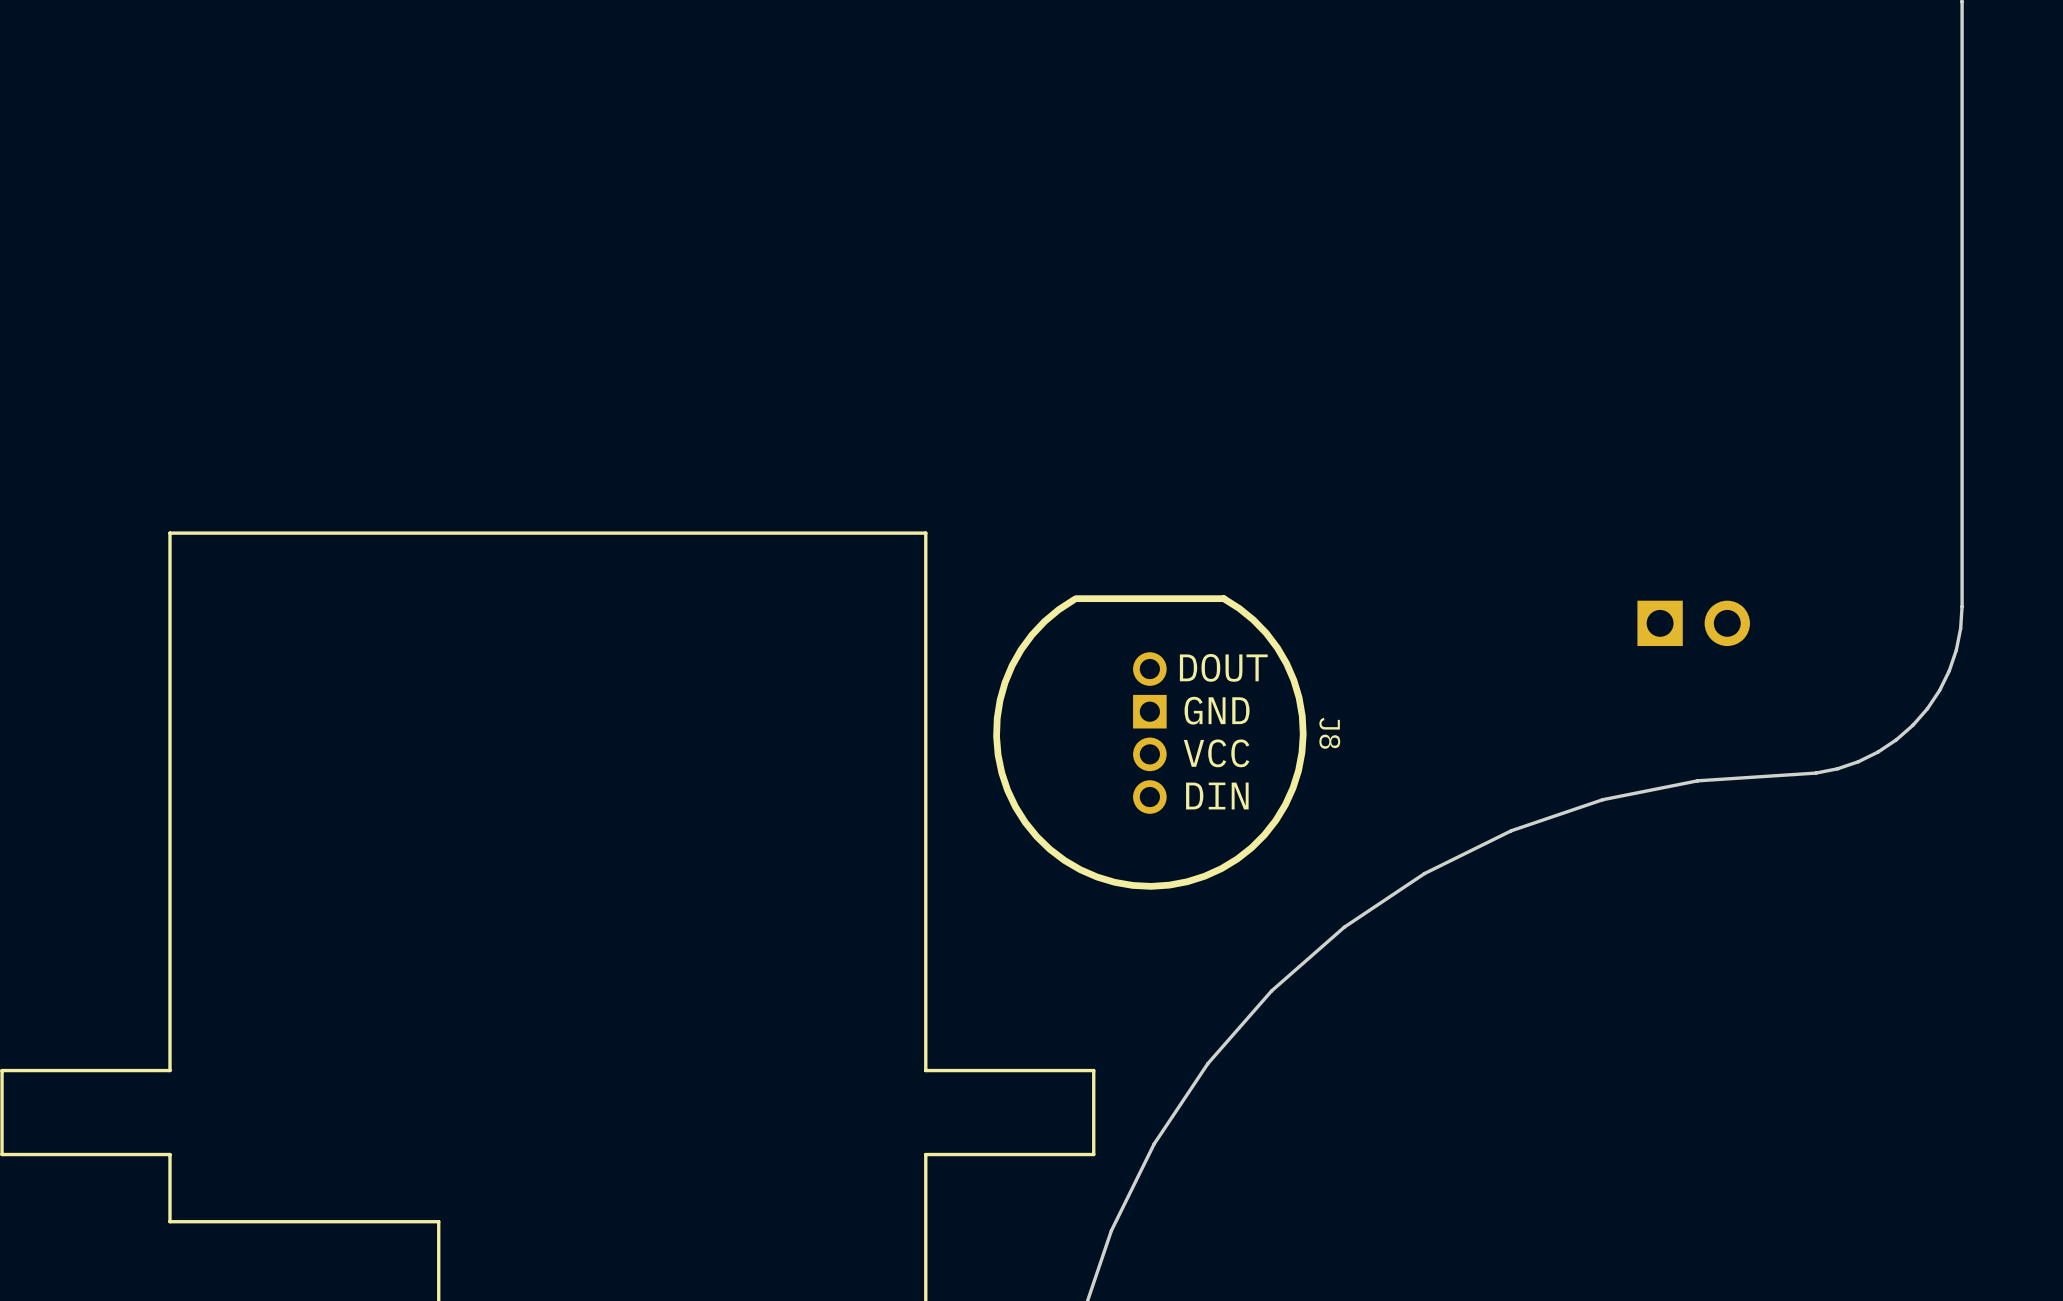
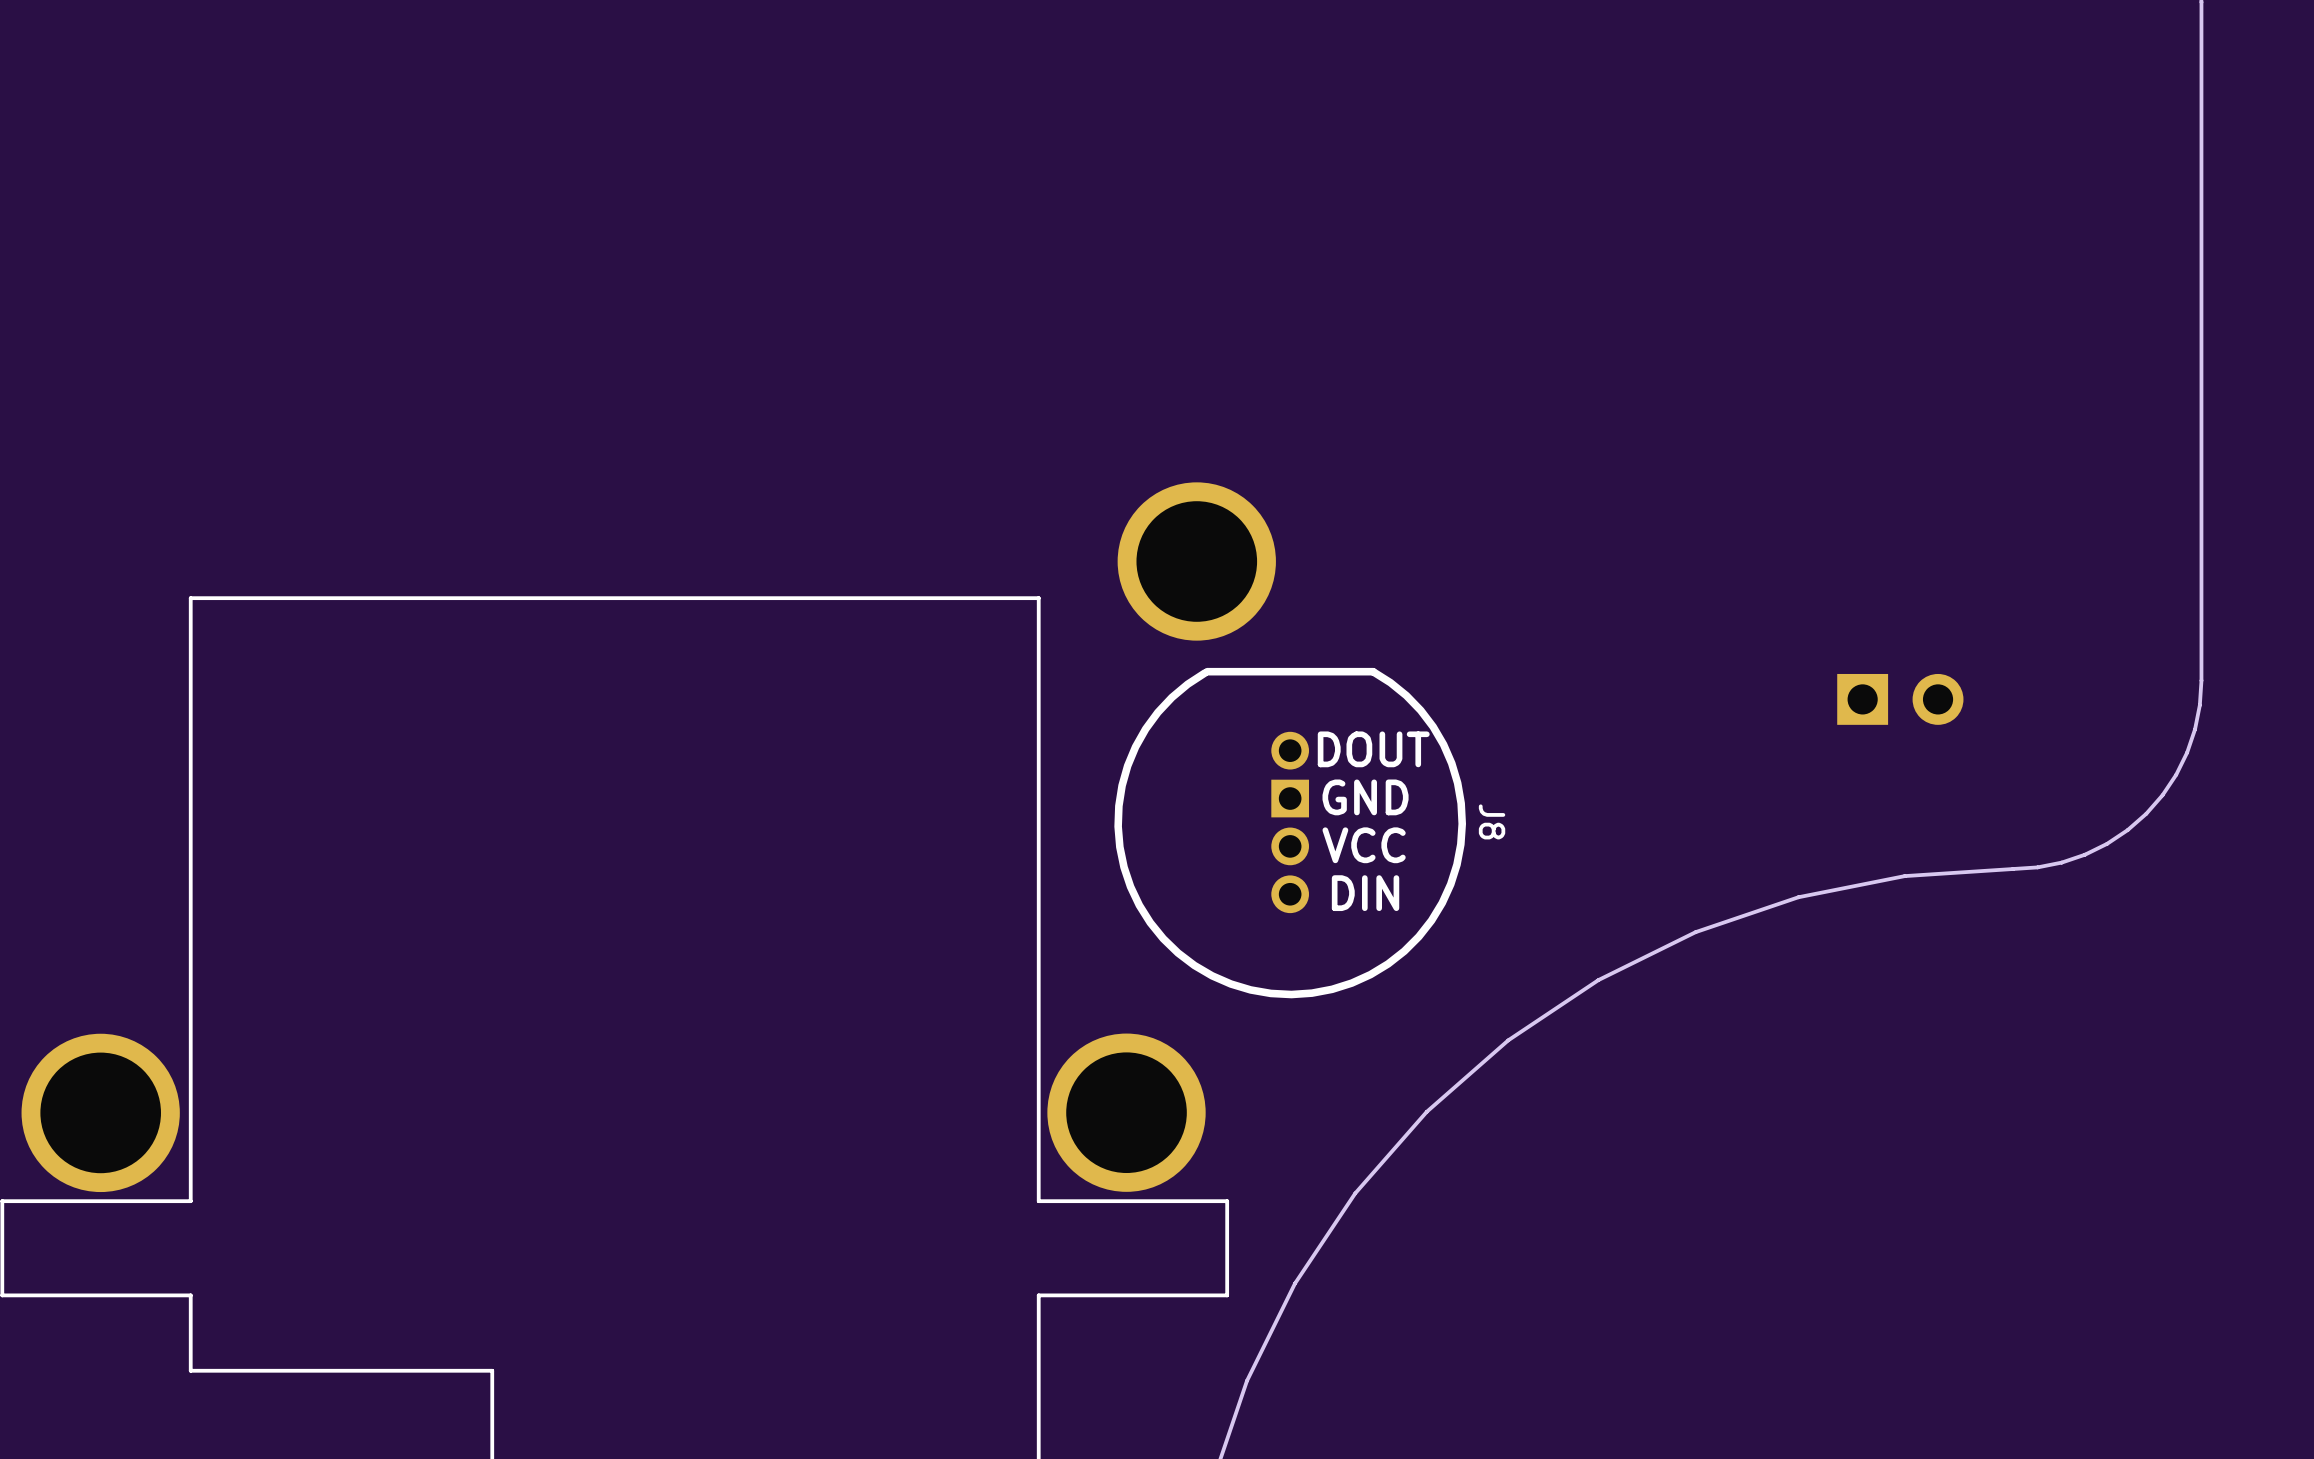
part: none -> (1196, 561)
part: none -> (100, 1112)
part: none -> (1126, 1112)

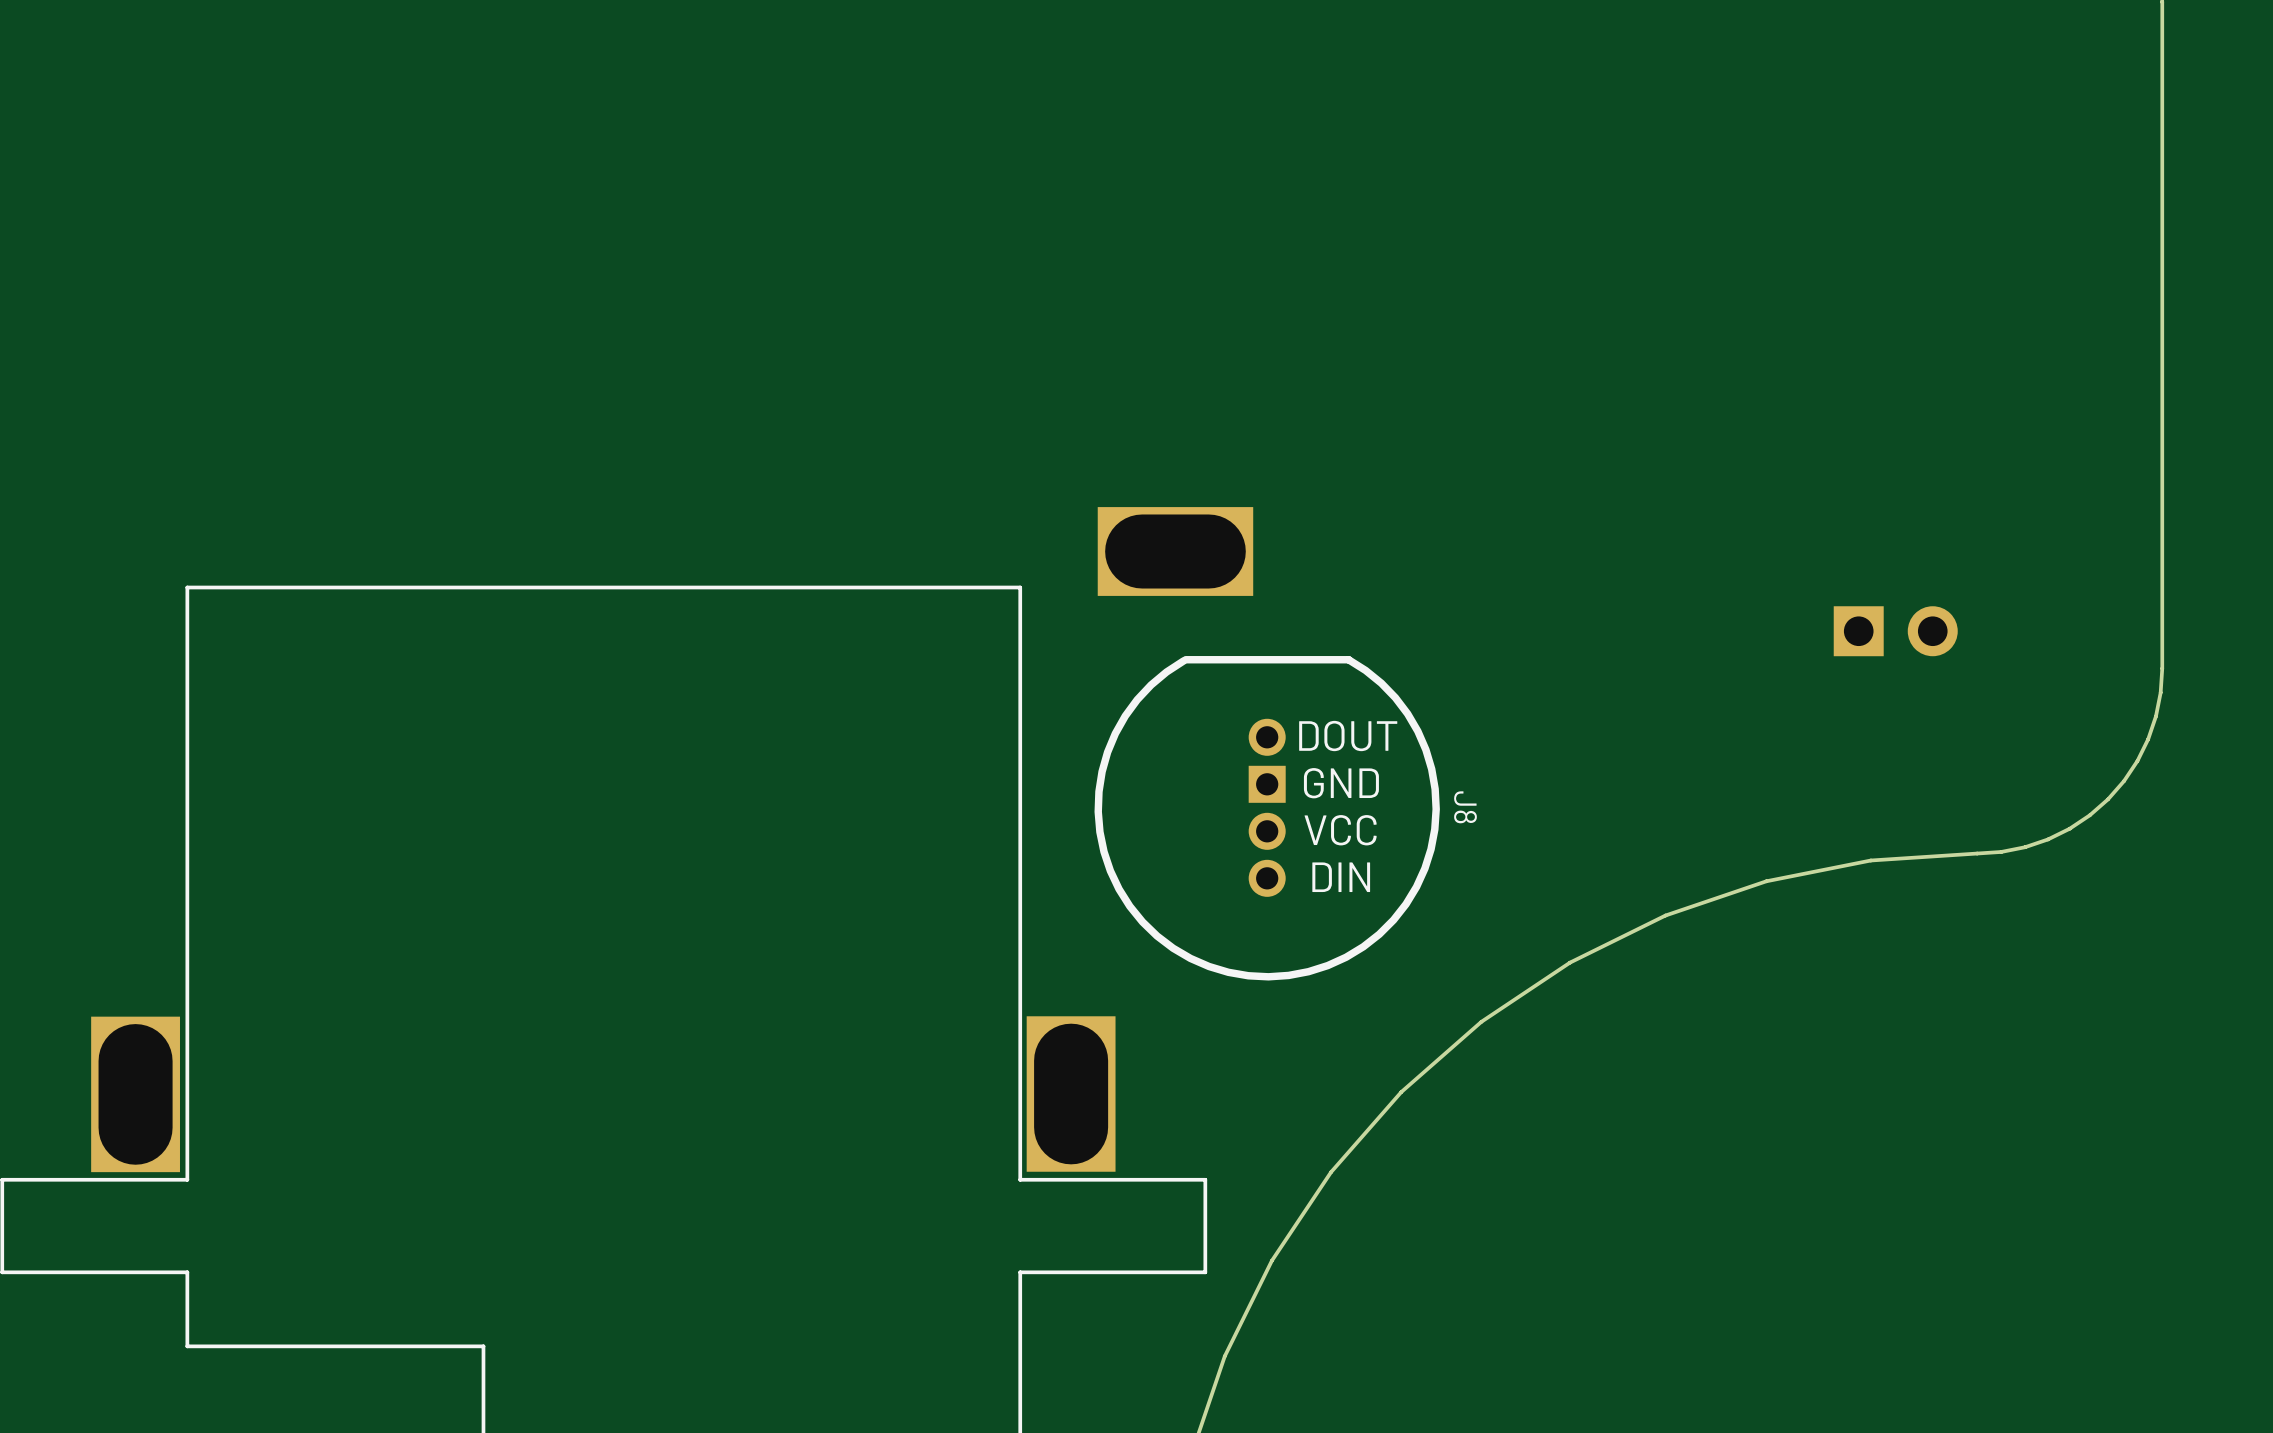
part footprint: [1117, 482, 1276, 641] -> [1097, 507, 1254, 596]
part position: (1900, 699) -> (1895, 631)
part footprint: [21, 1033, 180, 1193] -> [91, 1016, 180, 1173]
part footprint: [1047, 1033, 1206, 1192] -> [1026, 1016, 1116, 1172]

